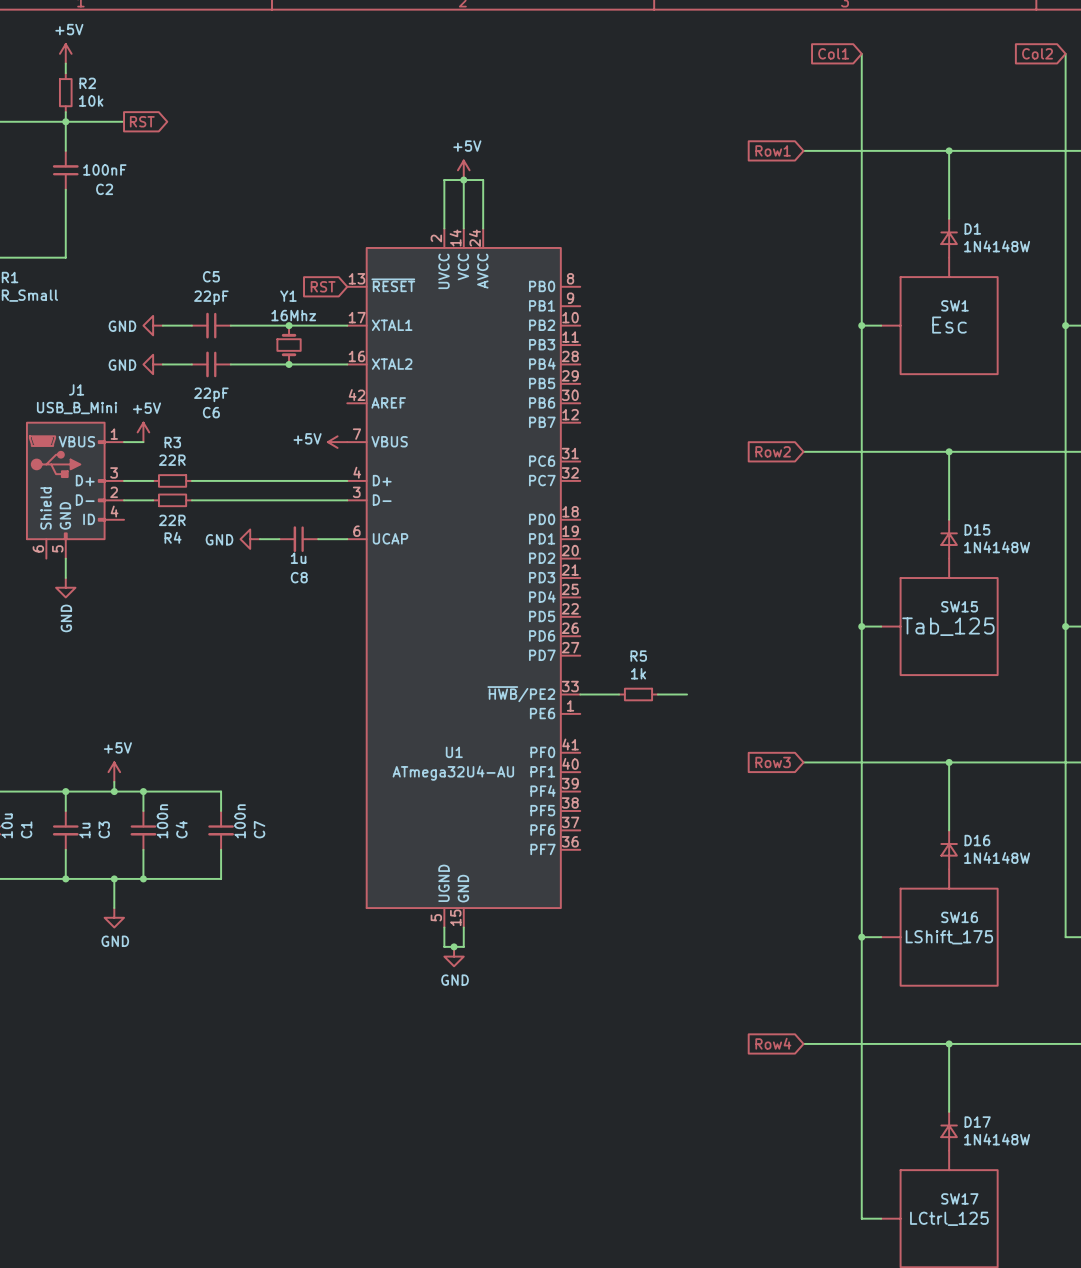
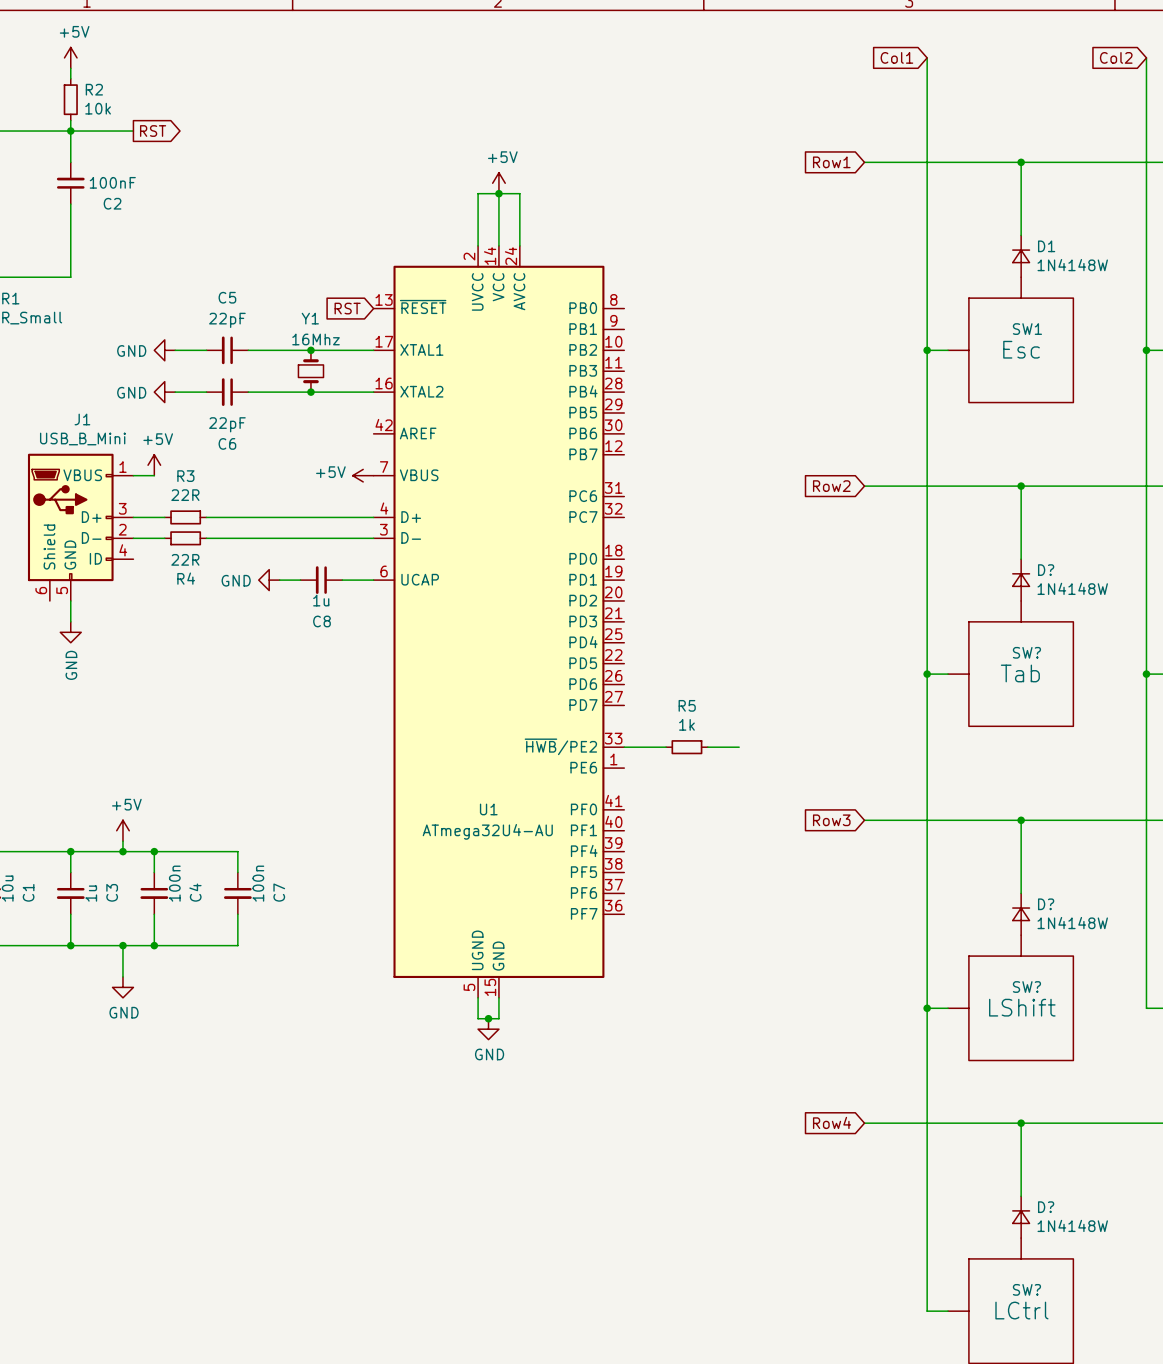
D15 name: D15 (977, 529) -> D? (1046, 570)
SW15 name: SW15 (959, 606) -> SW? (1026, 652)
SW15 value: Tab_125 (948, 626) -> Tab (1020, 673)
D16 name: D16 (977, 840) -> D? (1046, 904)
SW16 name: SW16 (959, 917) -> SW? (1026, 987)
SW16 value: LShift_175 (949, 937) -> LShift (1022, 1007)
D17 name: D17 (977, 1122) -> D? (1046, 1207)
SW17 name: SW17 (959, 1198) -> SW? (1026, 1289)
SW17 value: LCtrl_125 (949, 1218) -> LCtrl (1021, 1310)

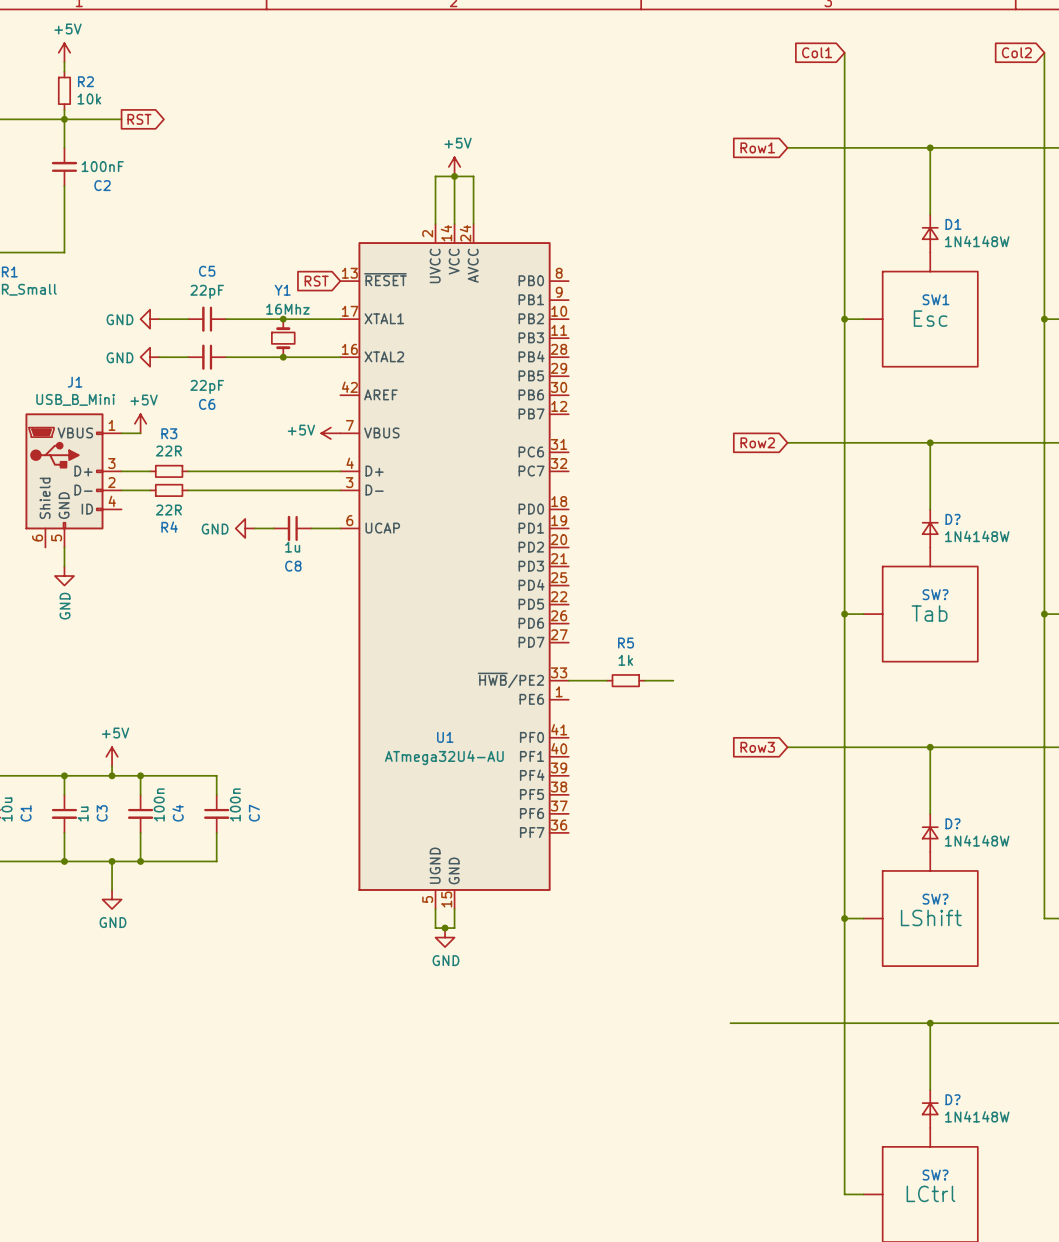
global label: Row4 (832, 1122) -> none
wire: none -> (730, 1023) (787, 1023)

